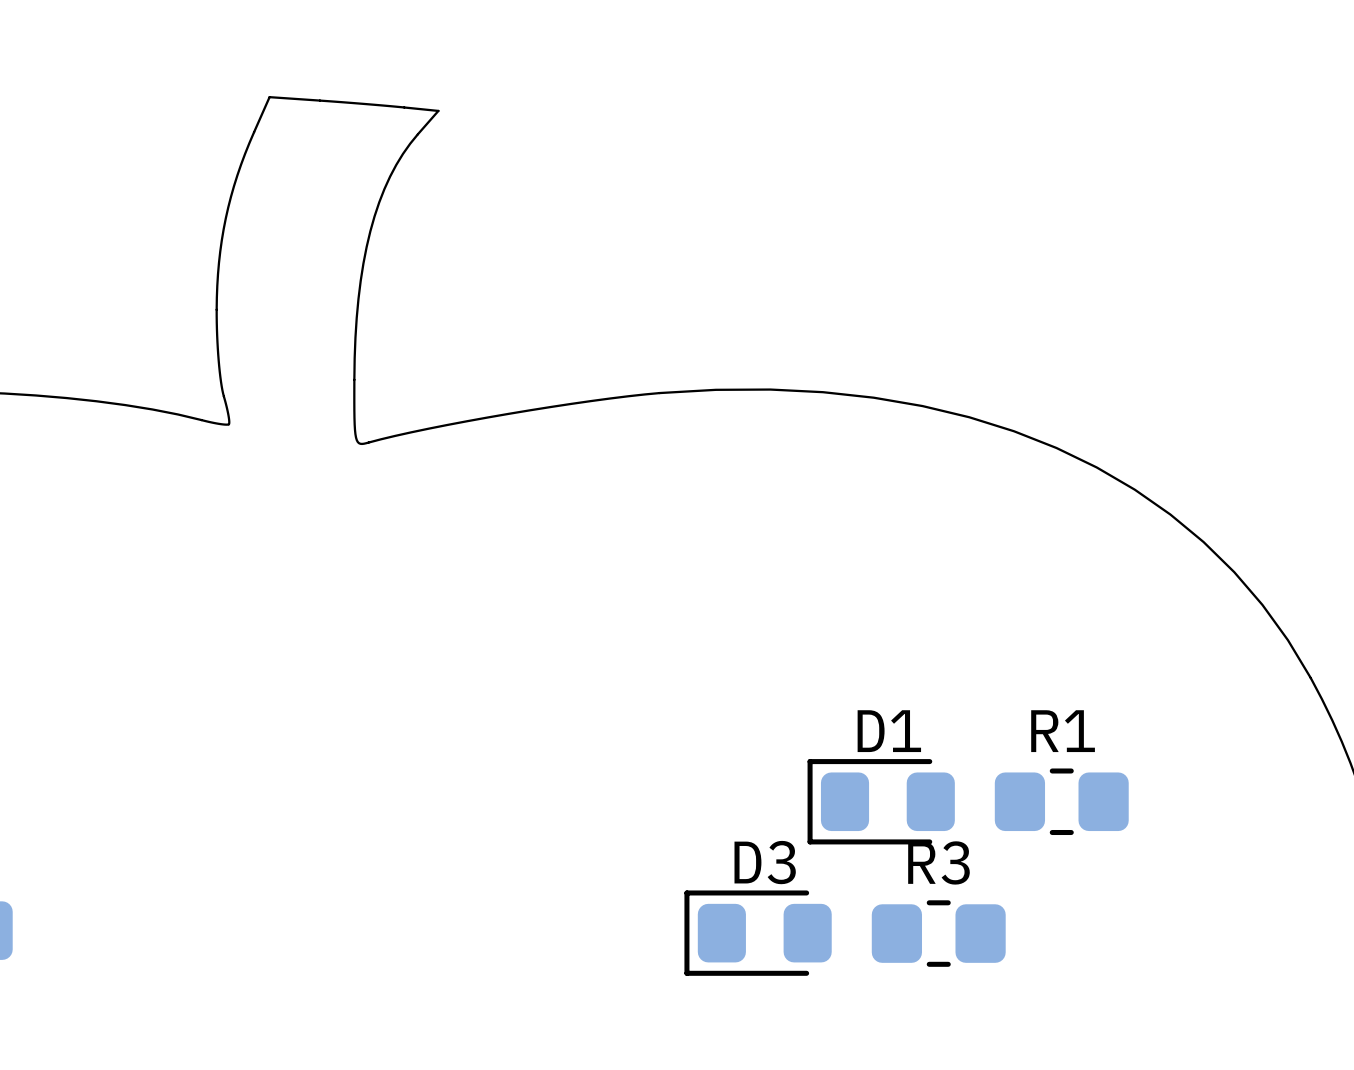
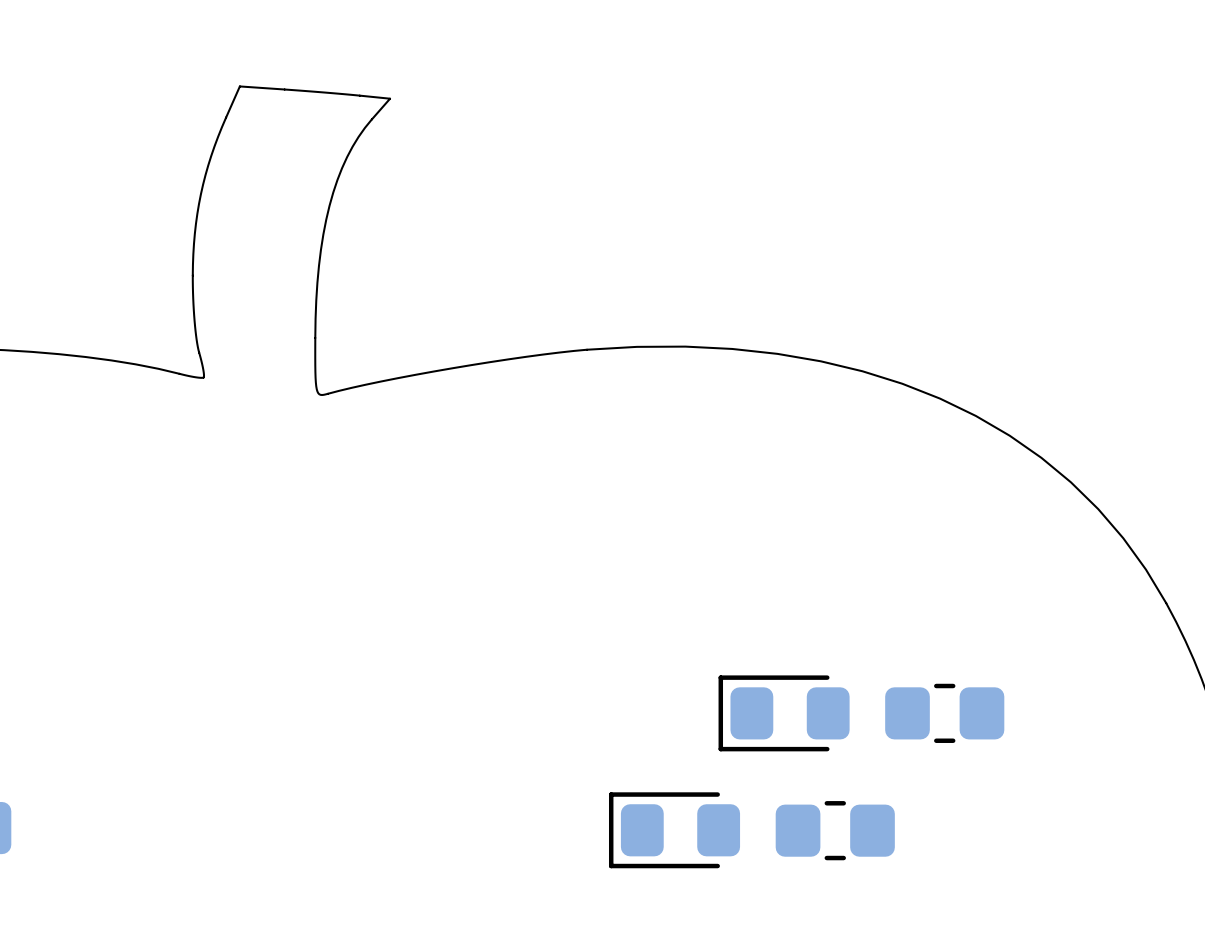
D1 name: D1 (889, 731) -> none
R1 name: R1 (1063, 731) -> none
D3 name: D3 (765, 862) -> none
R3 name: R3 (938, 862) -> none

